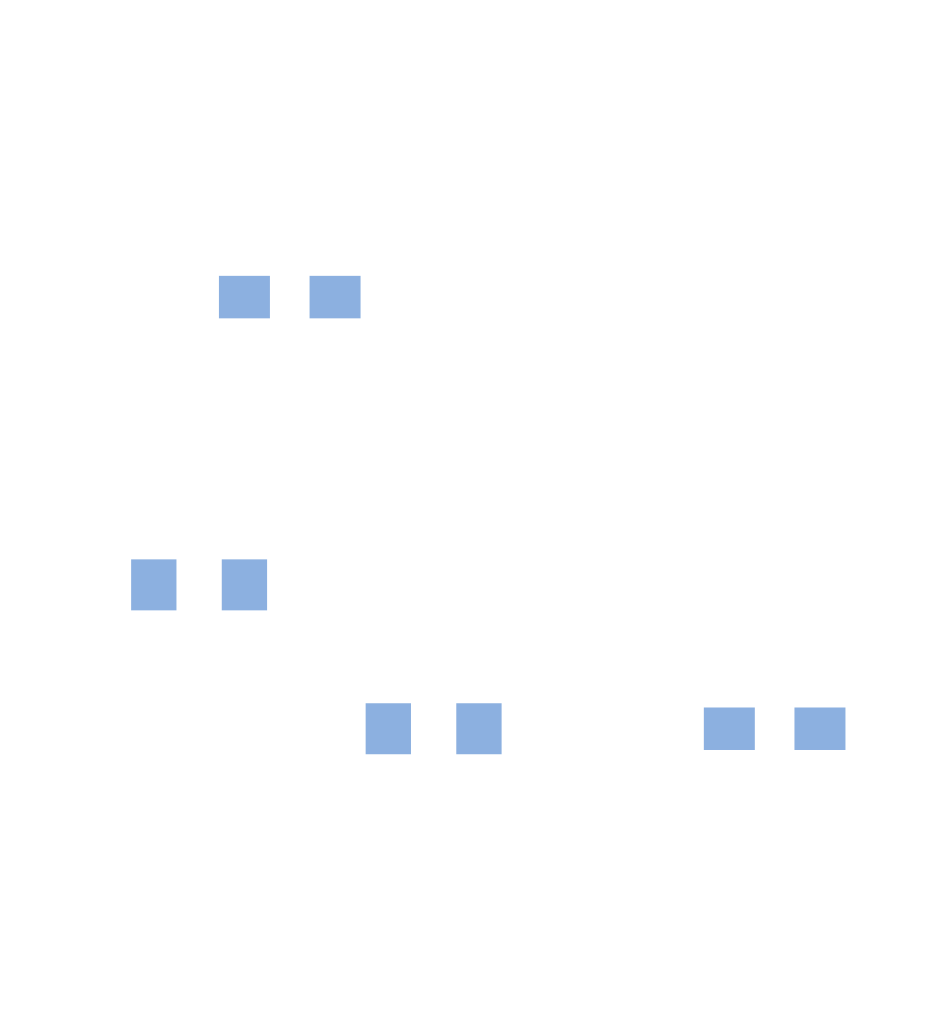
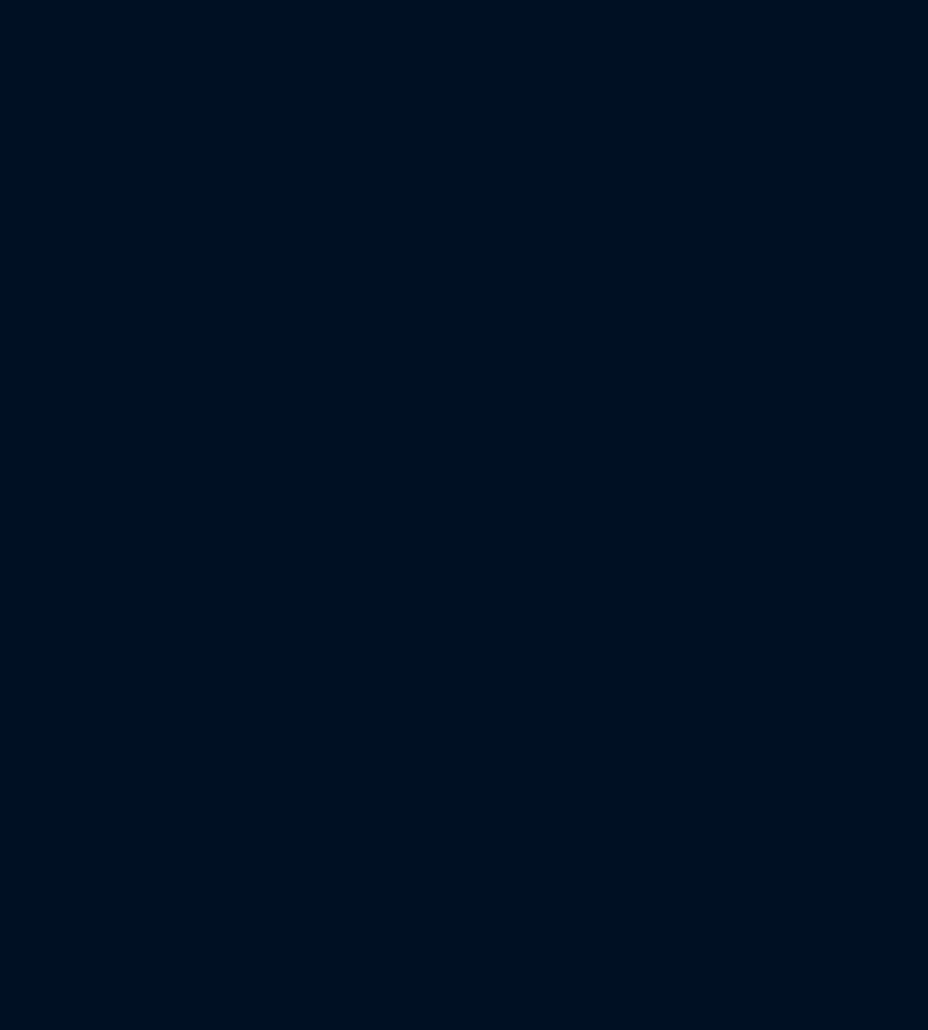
part: (289, 297) -> none
part: (199, 584) -> none
part: (433, 728) -> none
part: (774, 728) -> none

